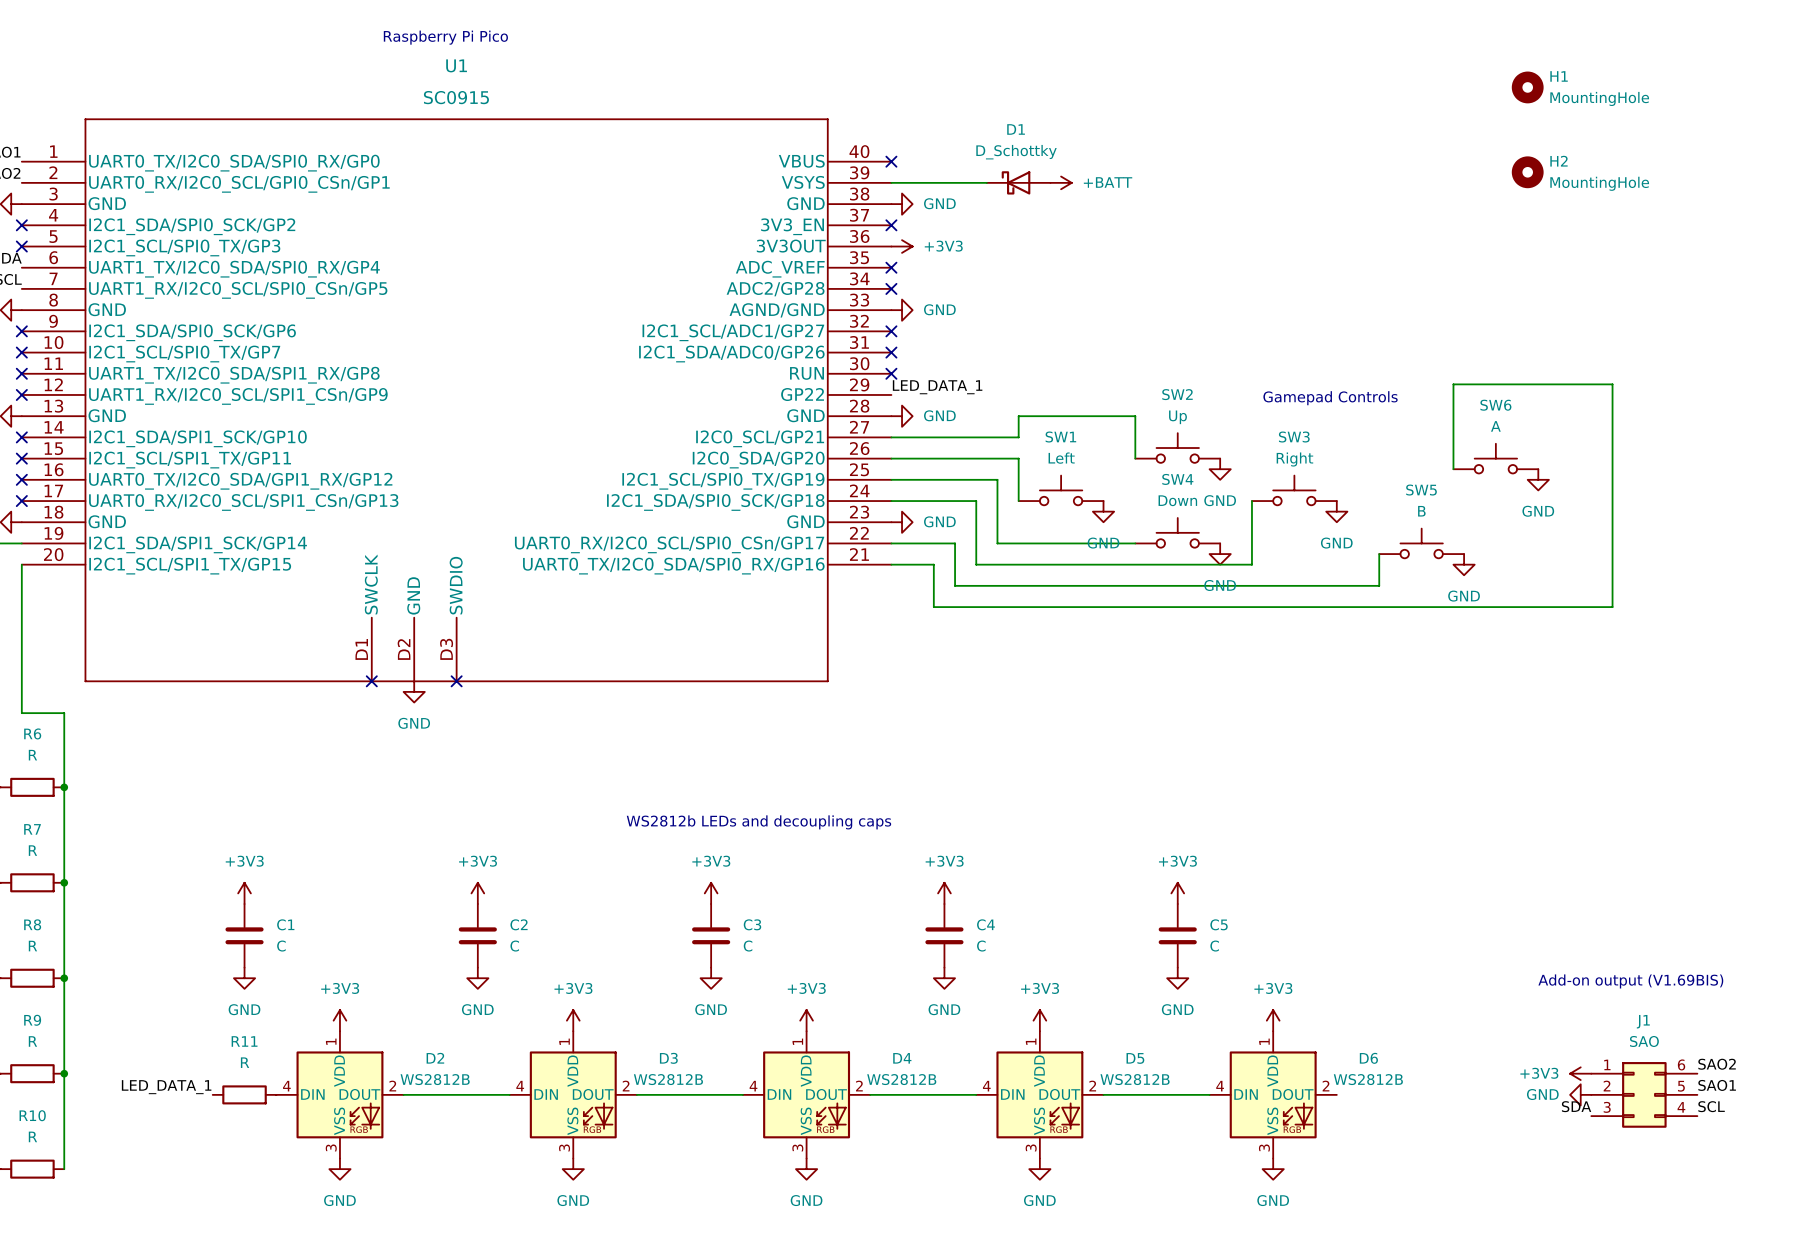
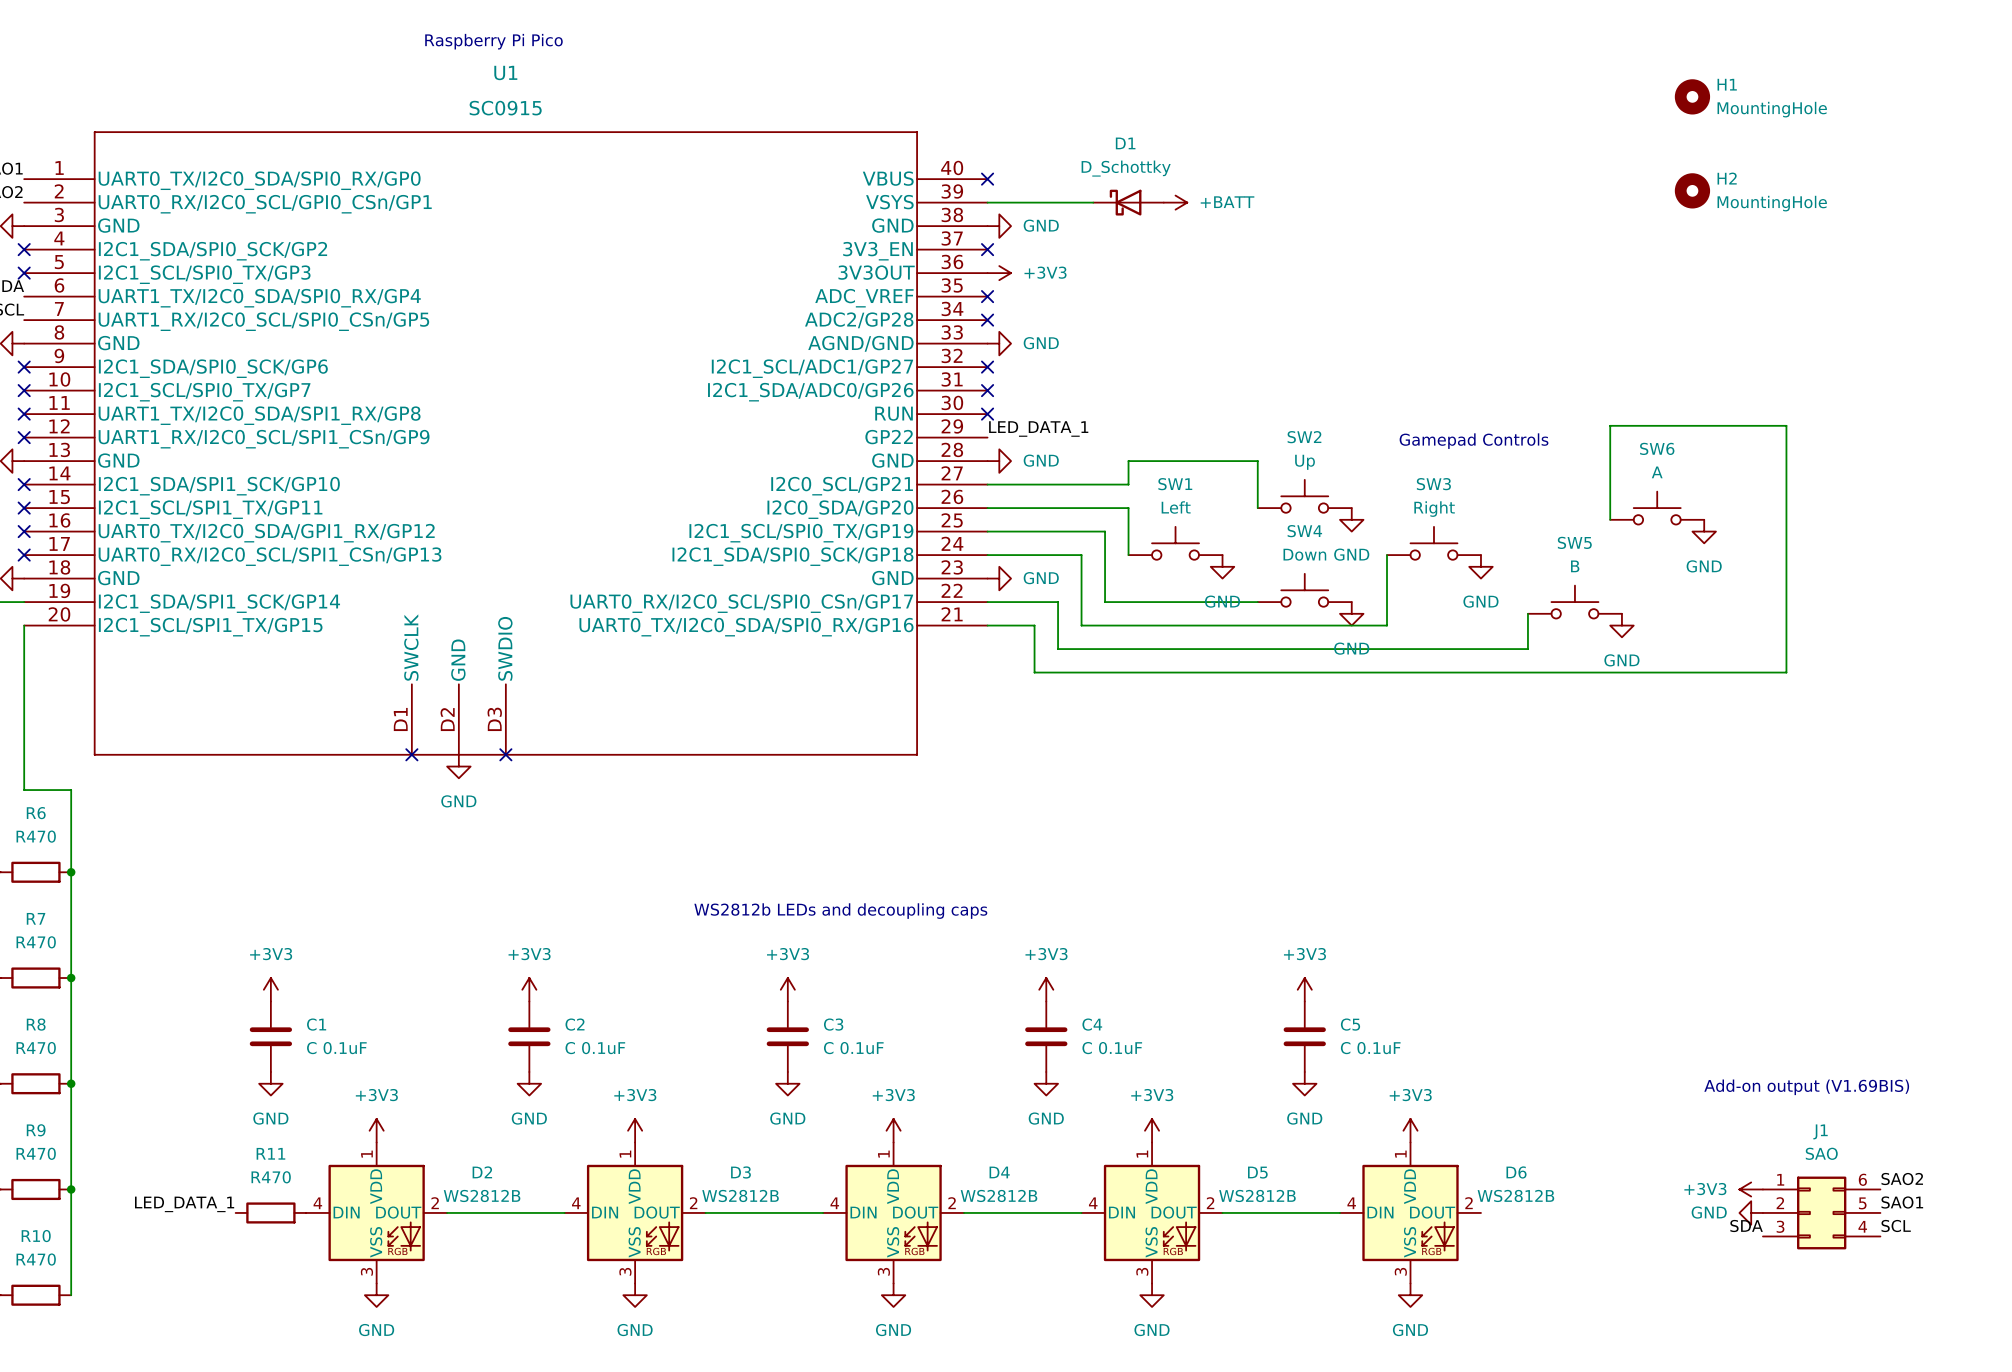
R6 value: R (32, 755) -> R470 (36, 836)
R7 value: R (32, 850) -> R470 (36, 942)
R8 value: R (32, 946) -> R470 (36, 1048)
C1 value: C (281, 946) -> C 0.1uF (336, 1048)
C2 value: C (514, 946) -> C 0.1uF (595, 1048)
C3 value: C (748, 946) -> C 0.1uF (853, 1048)
C4 value: C (981, 946) -> C 0.1uF (1112, 1048)
C5 value: C (1214, 946) -> C 0.1uF (1370, 1048)
R9 value: R (32, 1041) -> R470 (36, 1153)
R11 value: R (245, 1062) -> R470 (271, 1177)
R10 value: R (32, 1136) -> R470 (36, 1259)

